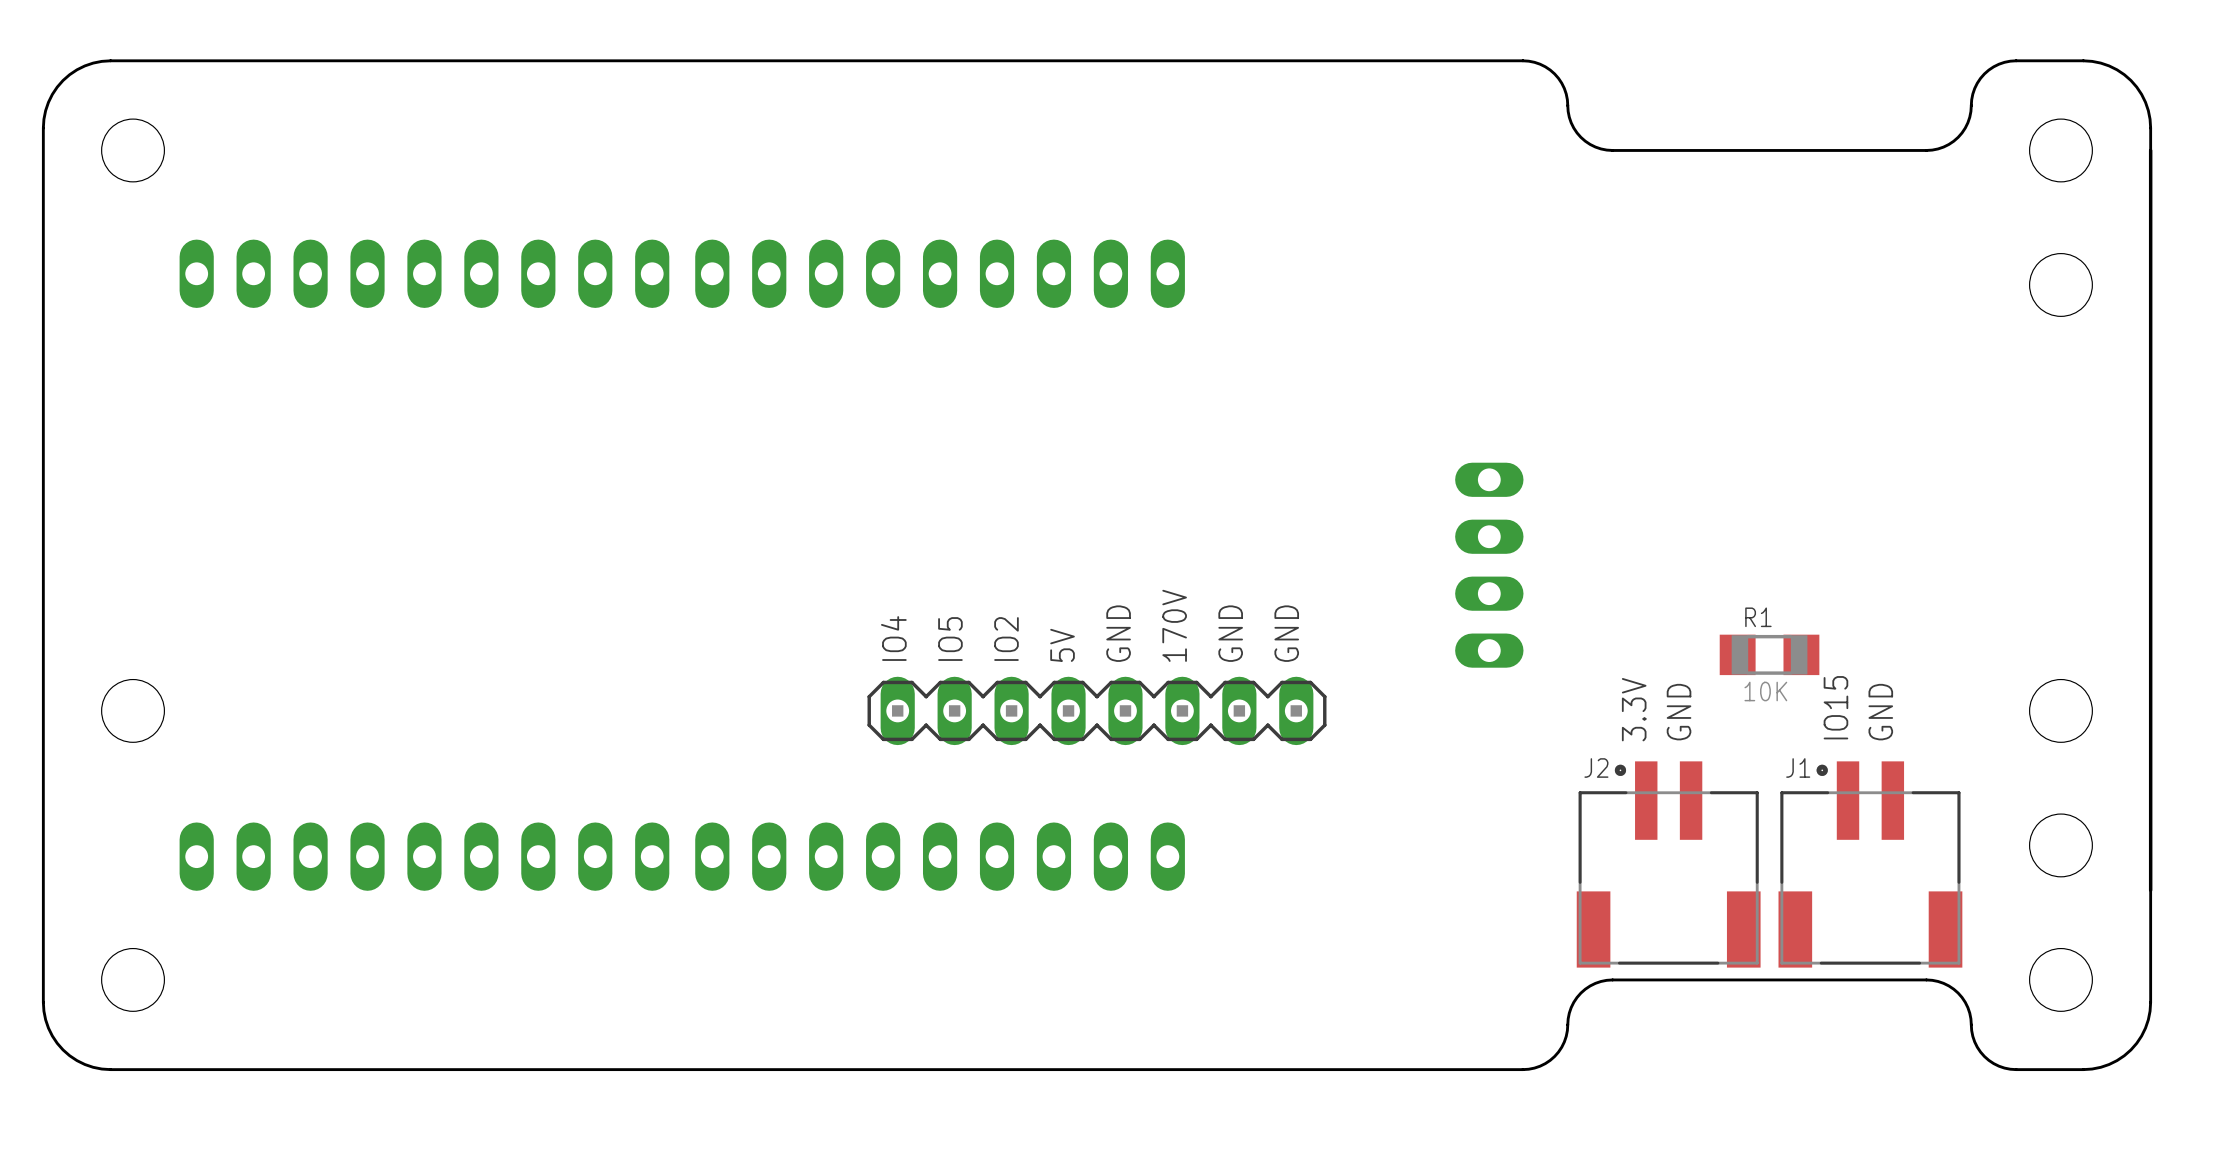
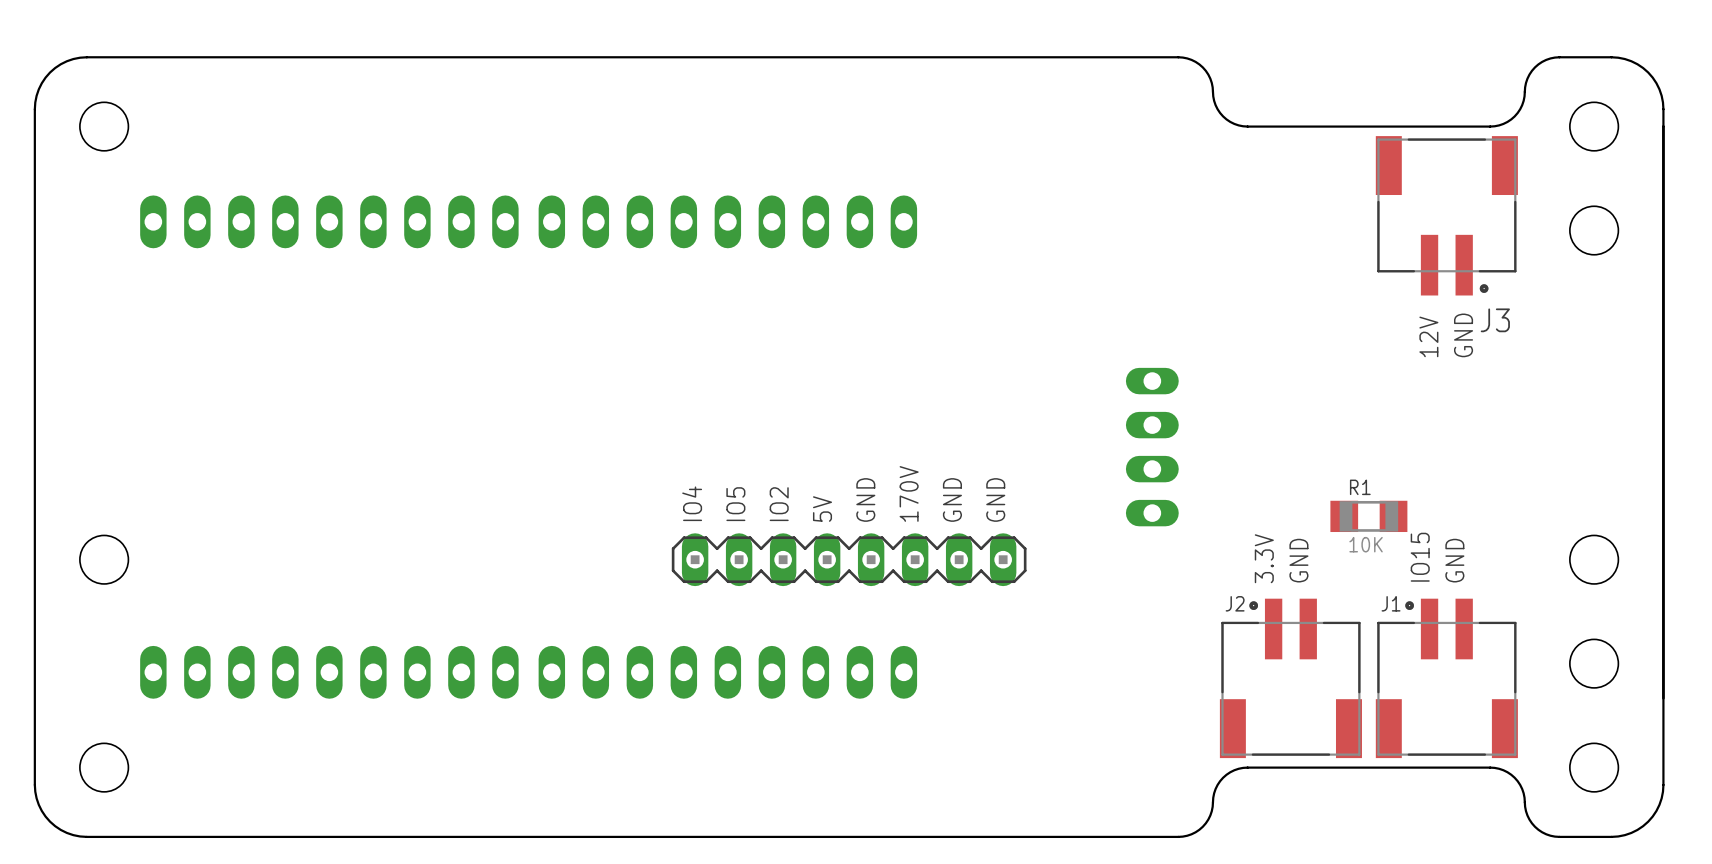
J3: none -> (1446, 215)
text: none -> GND (1463, 335)
text: none -> 12V (1428, 336)

